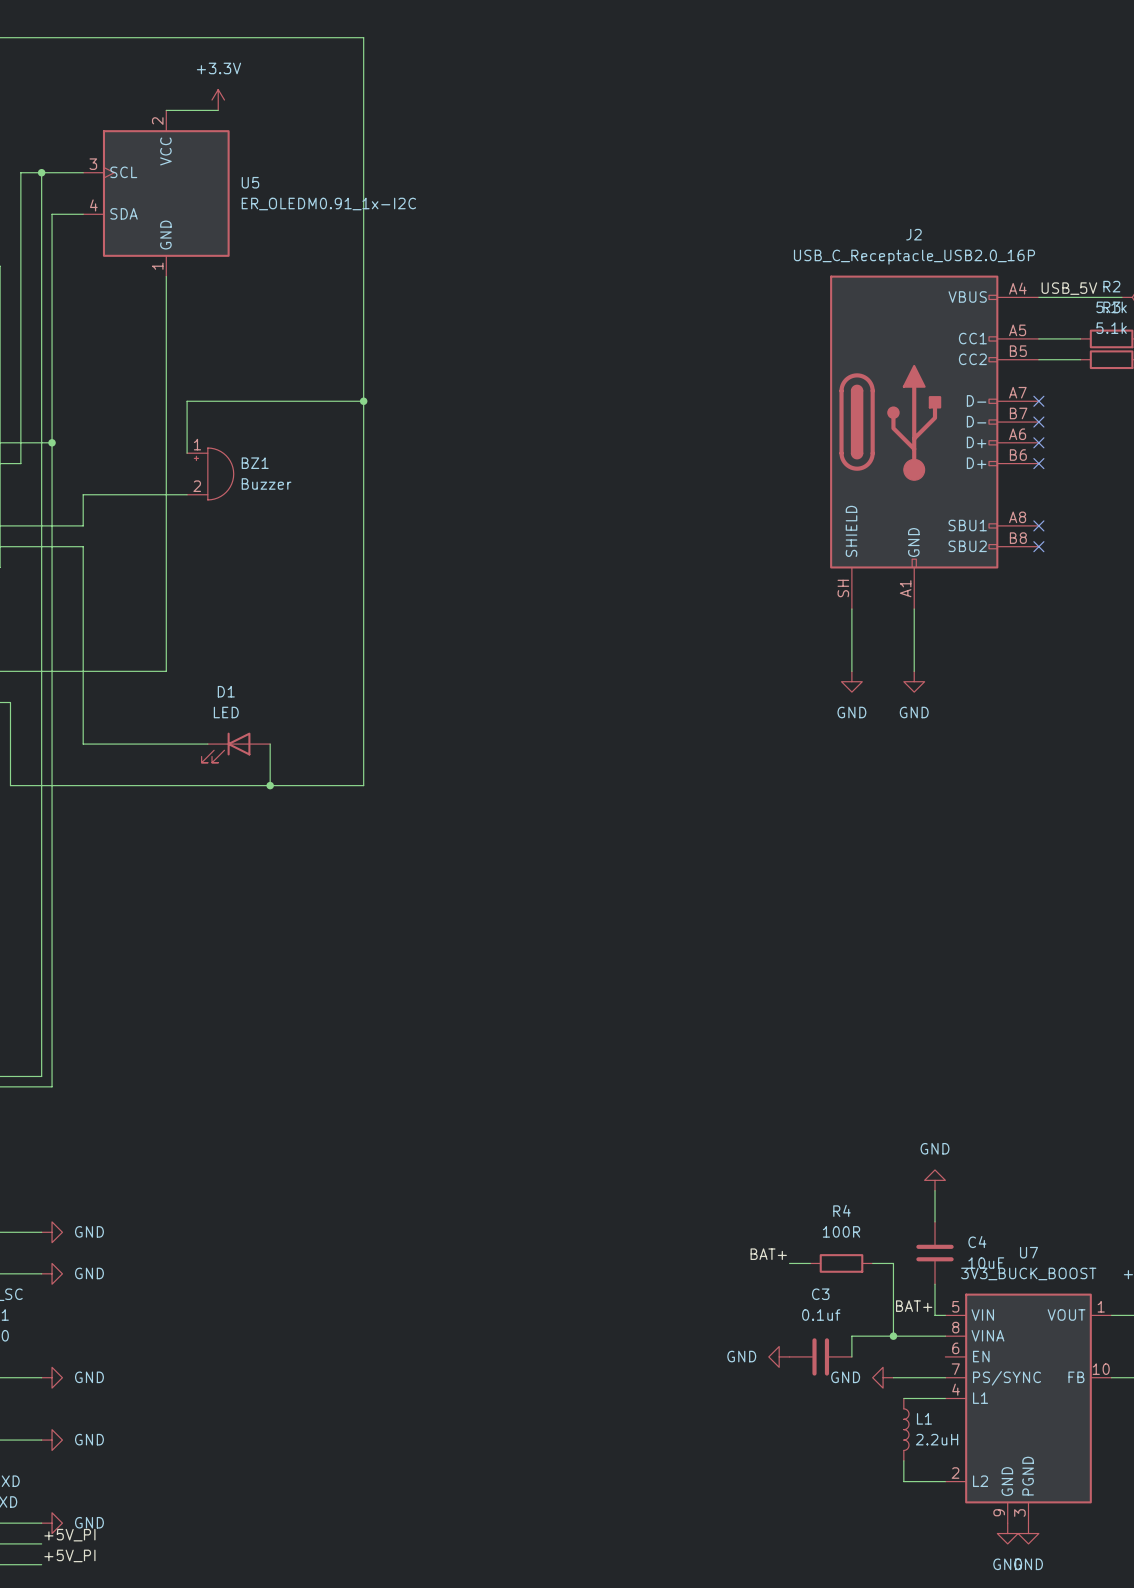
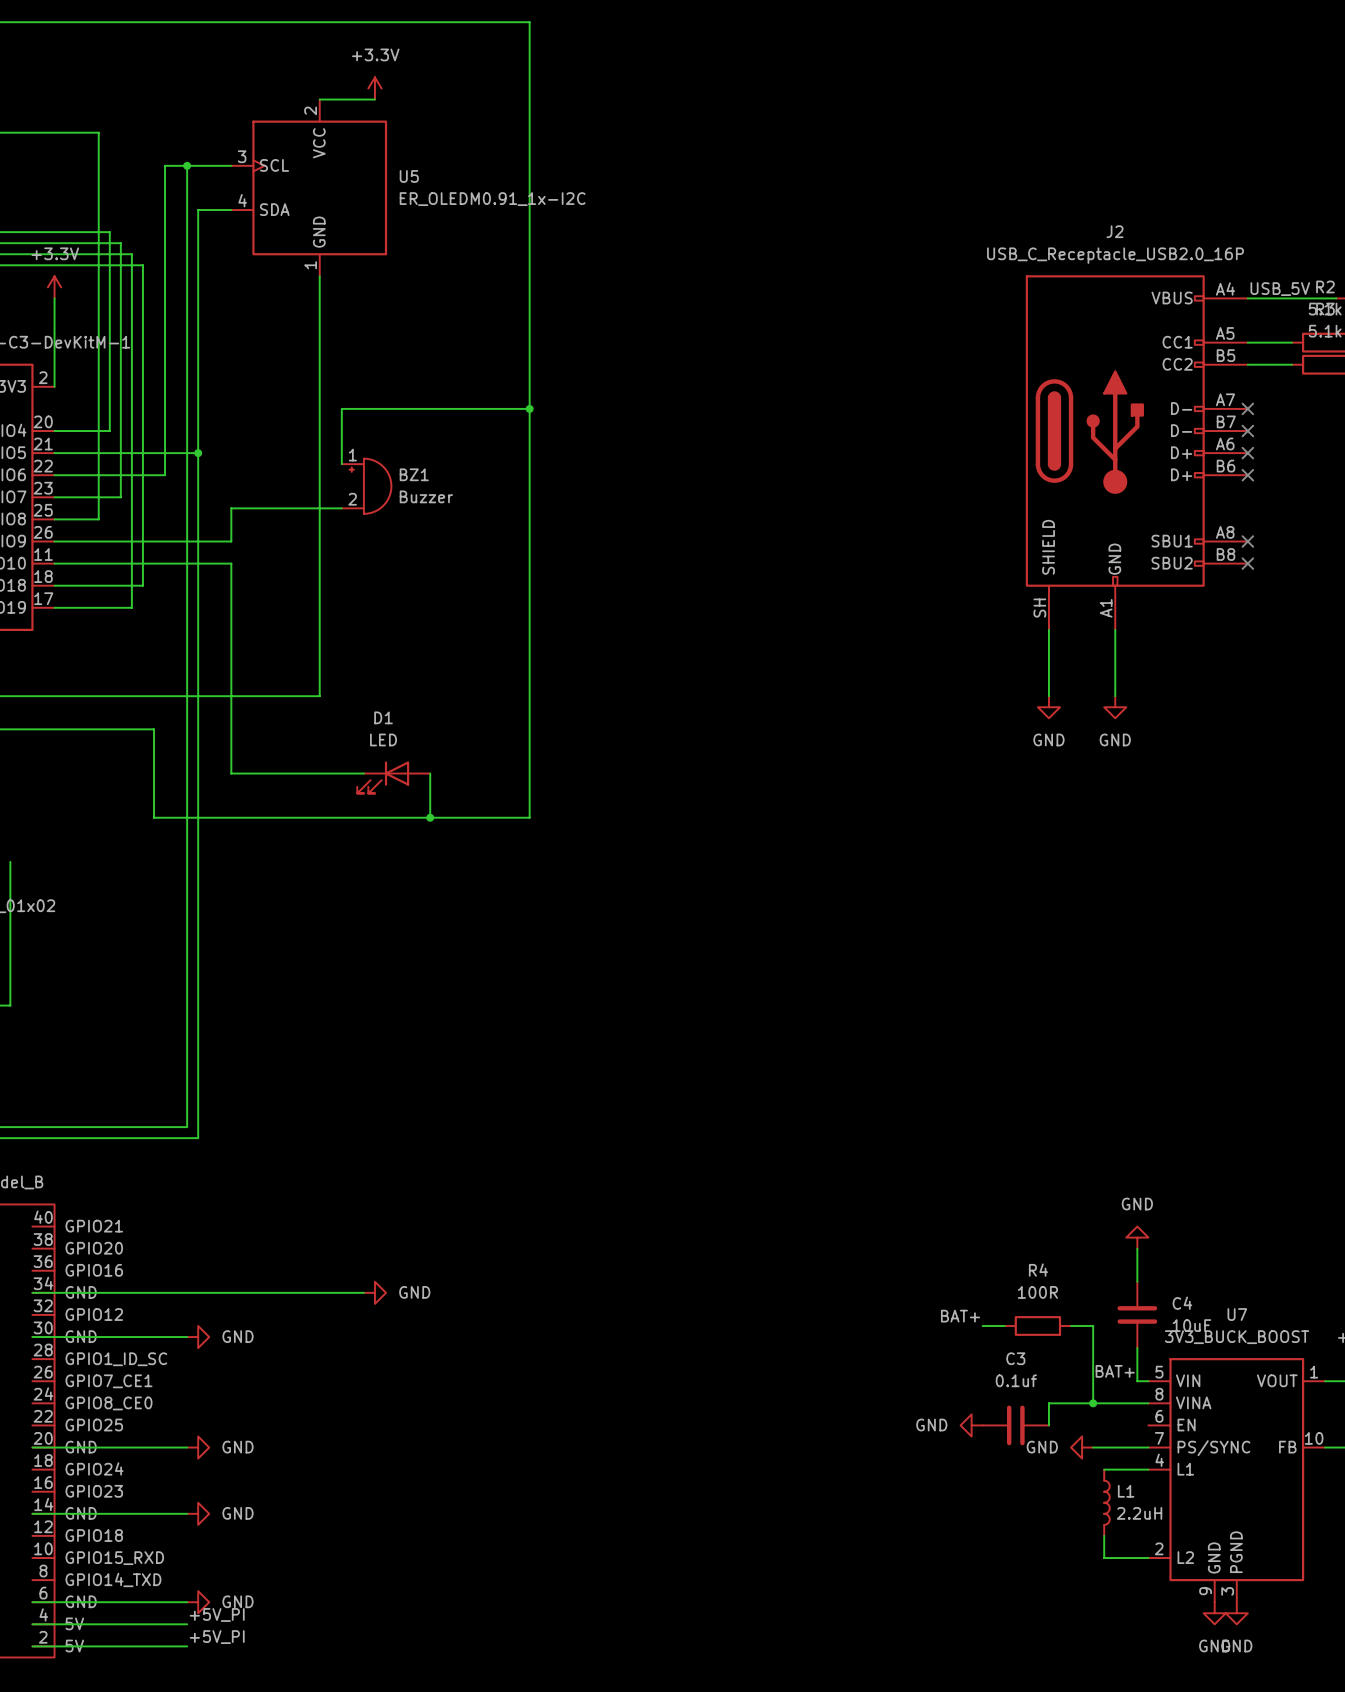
wire: none -> (187, 1292) (363, 1292)
power symbol position: GND (52, 1232) -> GND (374, 1292)

